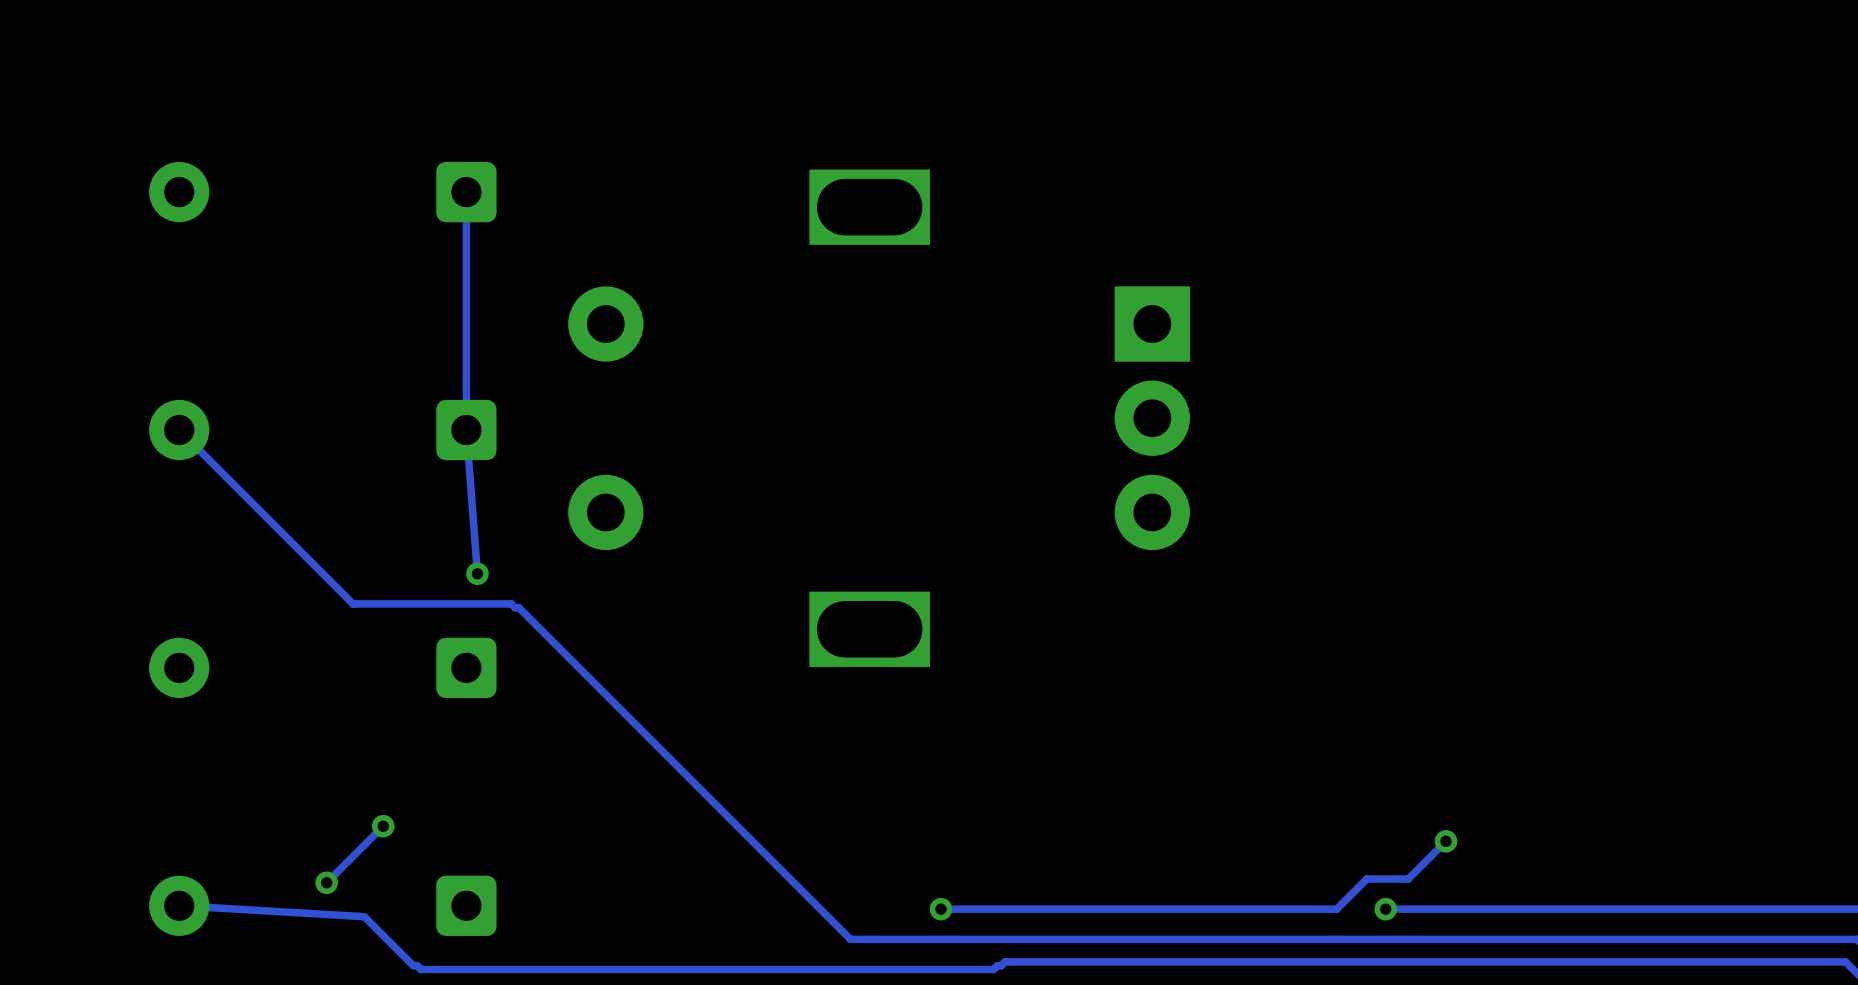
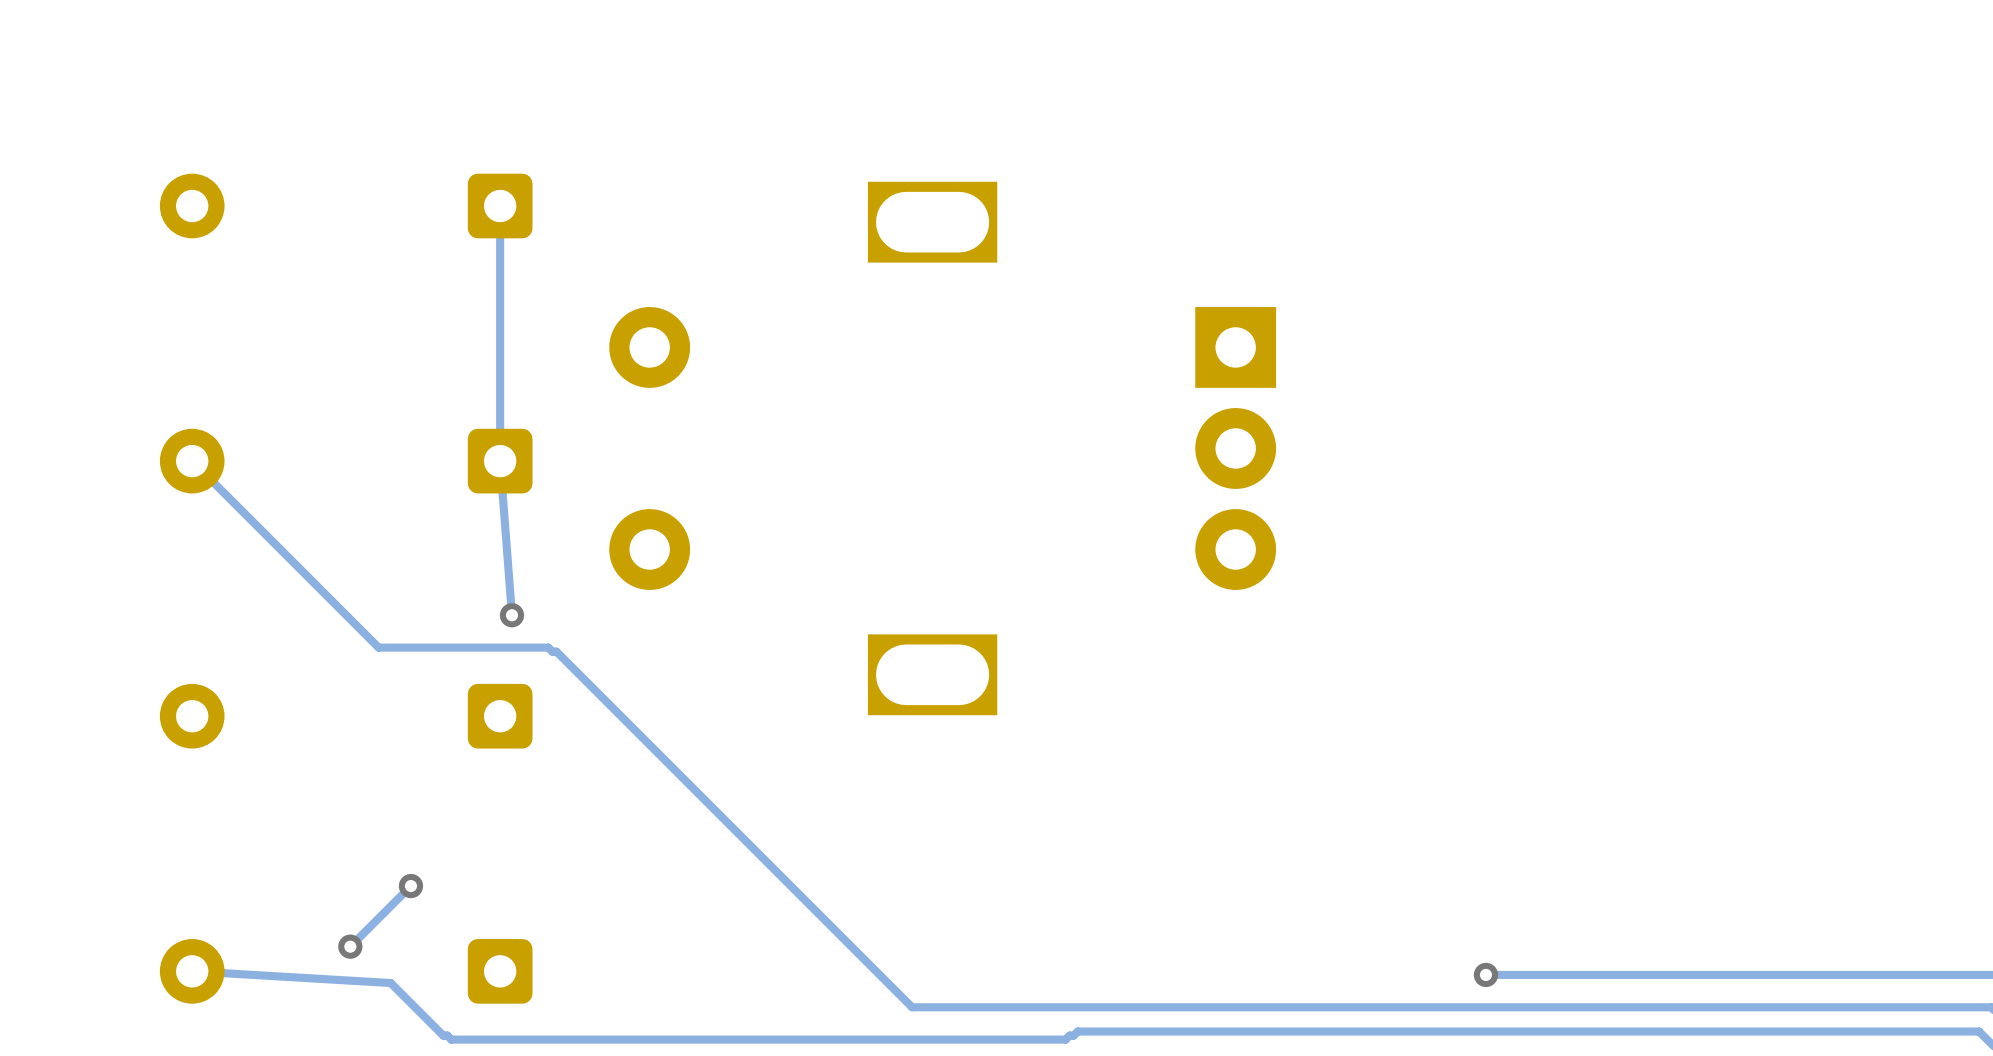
track: (1446, 841) (1408, 879) (1366, 879) (1336, 909) (940, 909) -> none
via: (1446, 841) -> none
via: (940, 909) -> none

